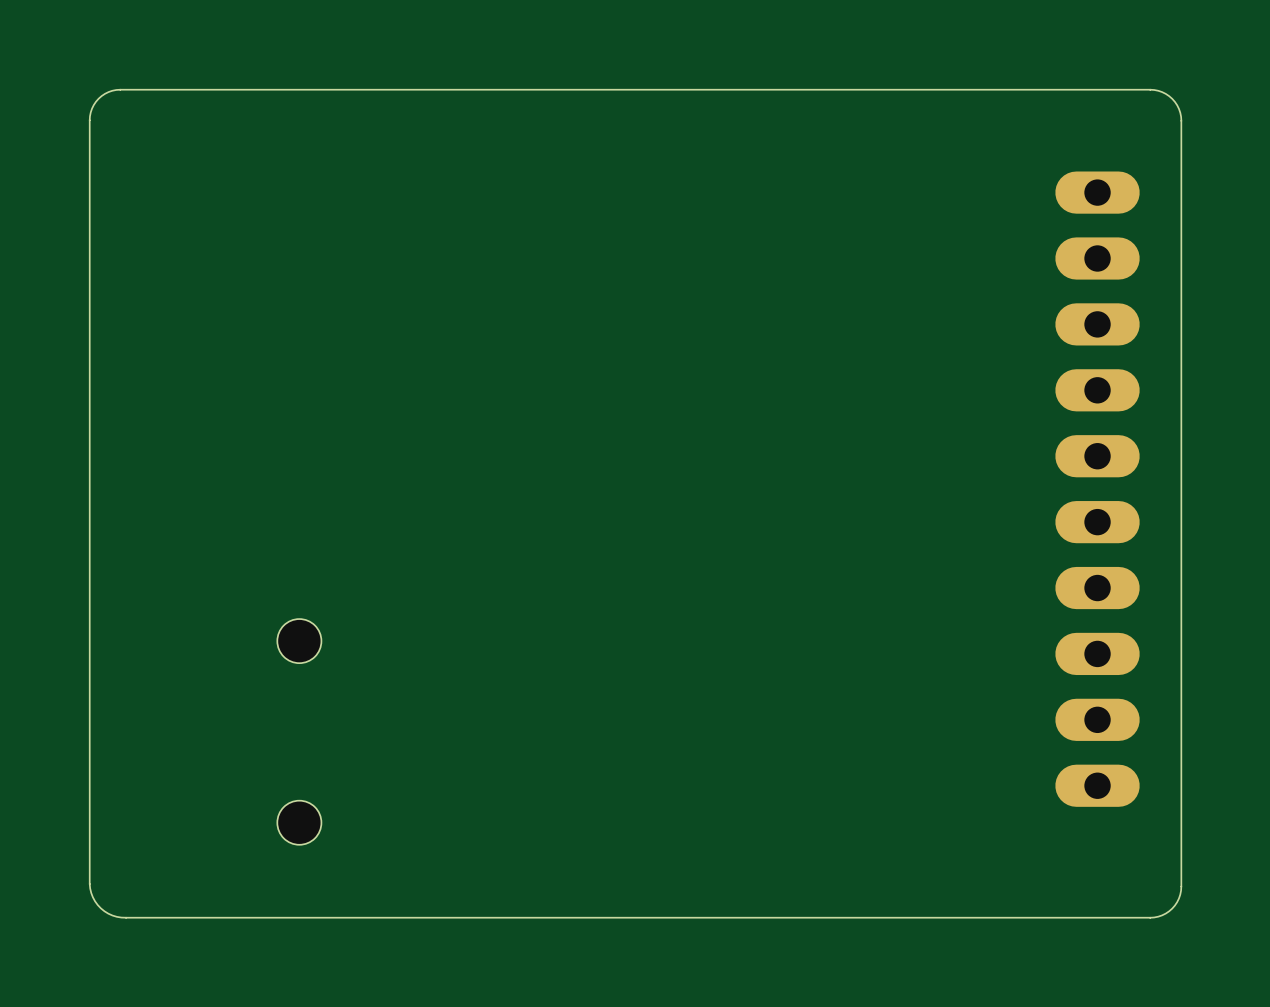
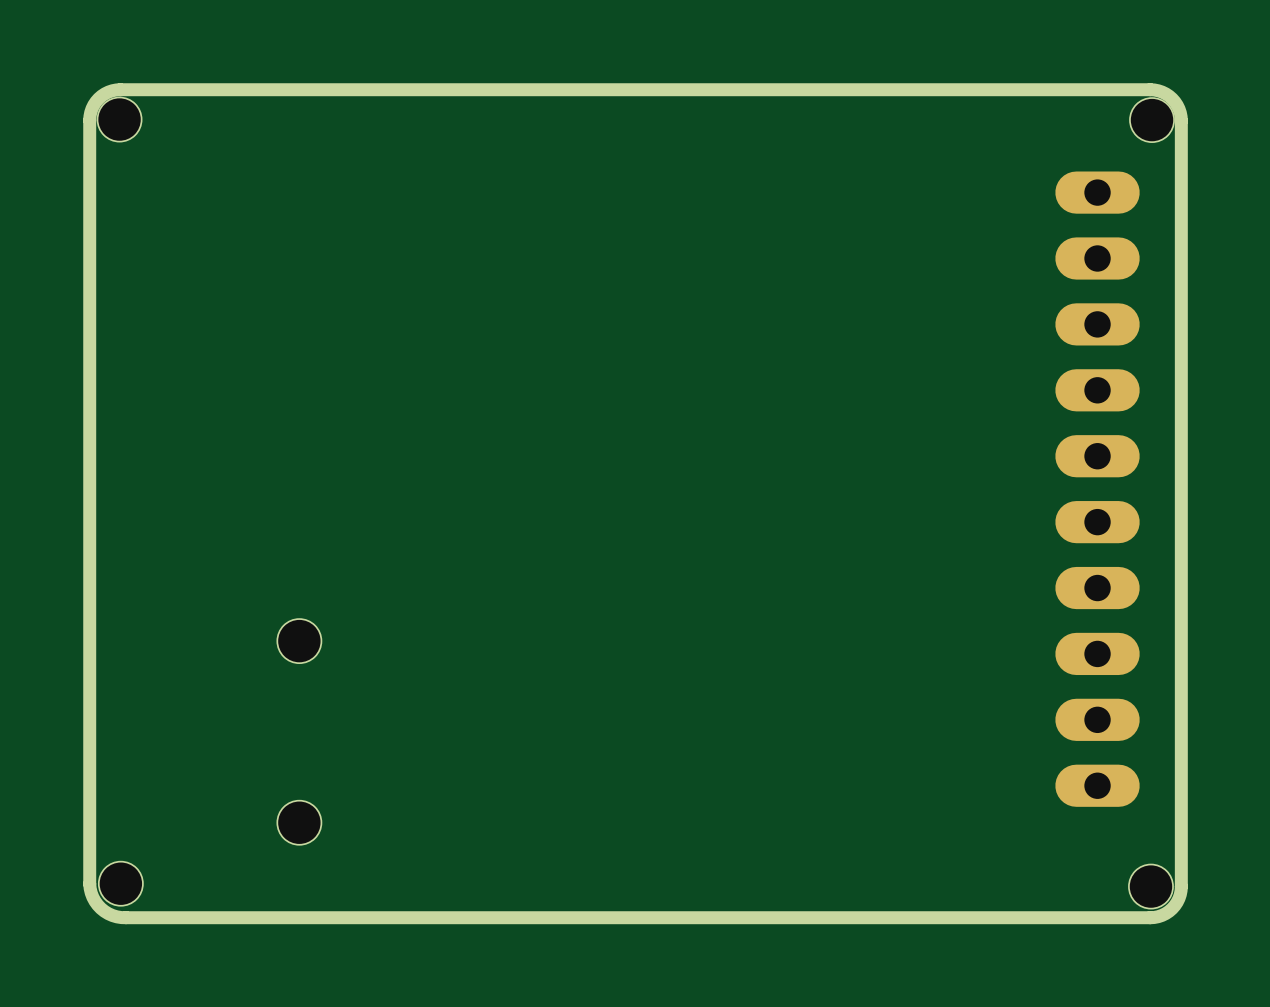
board edge width: thin (1150, 89) (120, 89) (108, 92) (101, 96) (93, 105) (89, 120) (89, 883) (91, 893) (97, 905) (112, 915) (126, 917) (1150, 917) (1158, 916) (1169, 911) (1178, 898) (1181, 886) (1181, 120) (1179, 108) (1172, 98) (1162, 92) (1150, 89) -> thick (1150, 89) (120, 89) (108, 92) (101, 96) (93, 105) (89, 120) (89, 883) (91, 893) (97, 905) (112, 915) (126, 917) (1150, 917) (1158, 916) (1169, 911) (1178, 898) (1181, 886) (1181, 120) (1179, 108) (1172, 98) (1162, 92) (1150, 89)
part: none -> (119, 119)
part: none -> (1152, 120)
part: none -> (120, 883)
part: none -> (1150, 886)

